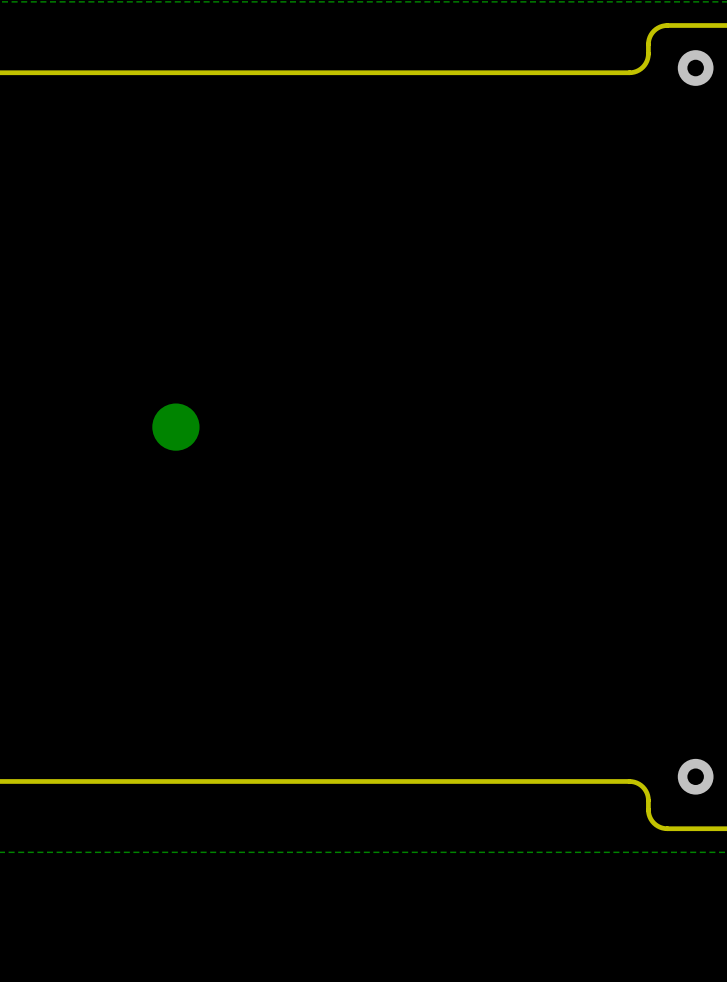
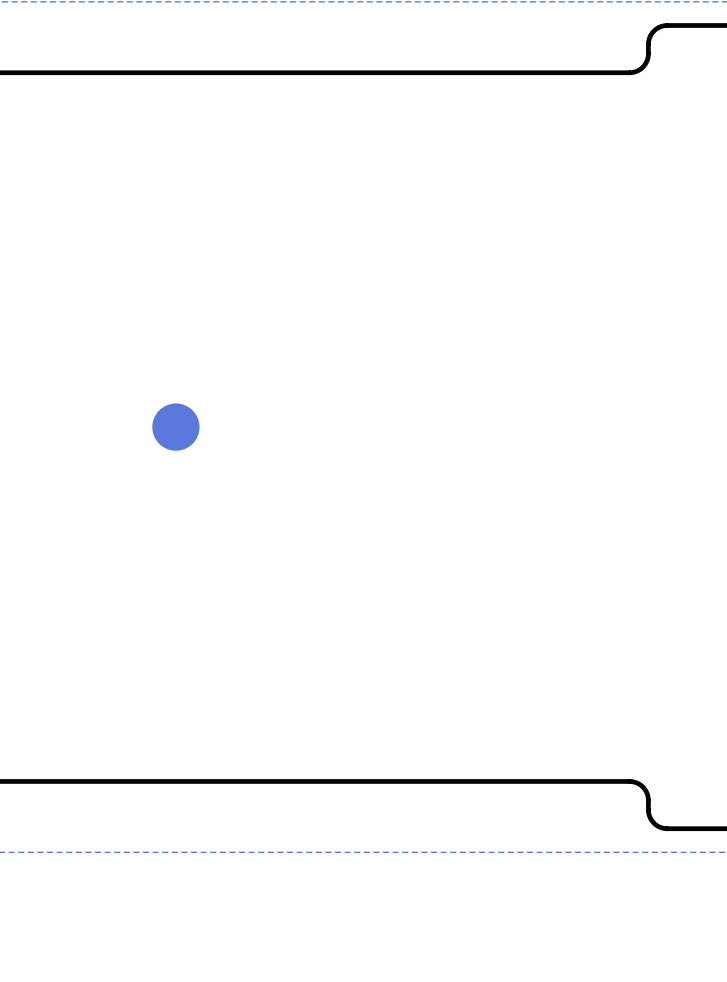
via: (695, 68) -> none
via: (695, 776) -> none

